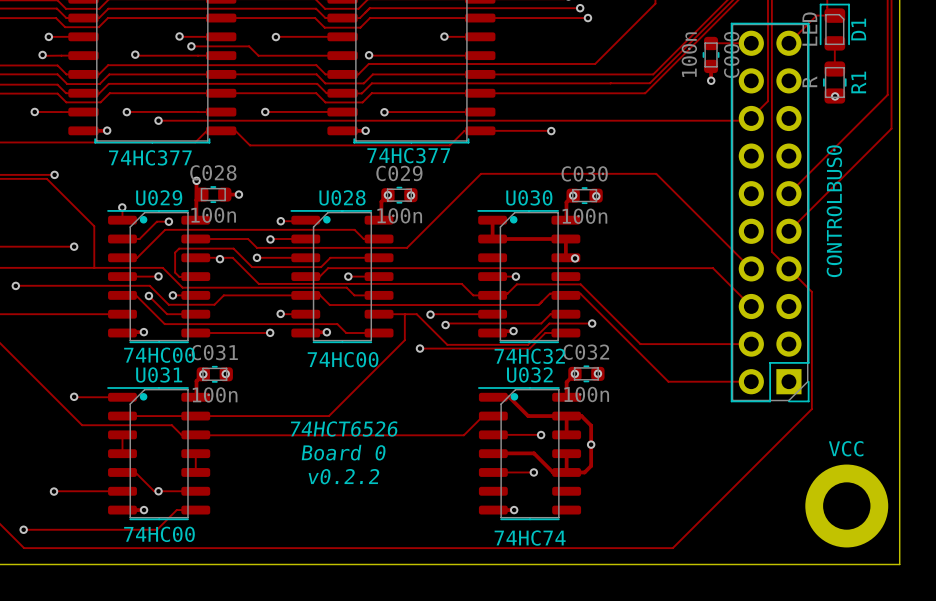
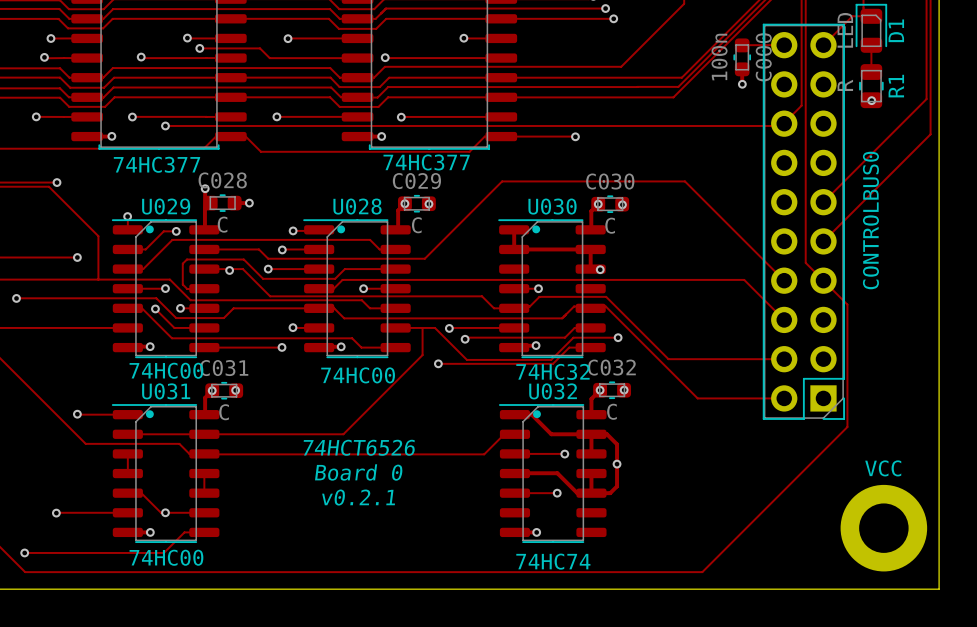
C028 value: 100n (213, 215) -> C (222, 224)
C029 value: 100n (399, 215) -> C (416, 225)
C030 value: 100n (584, 216) -> C (610, 225)
C031 value: 100n (215, 394) -> C (224, 412)
C032 value: 100n (586, 394) -> C (611, 411)
text: v0.2.2 (344, 476) -> v0.2.1 (358, 497)

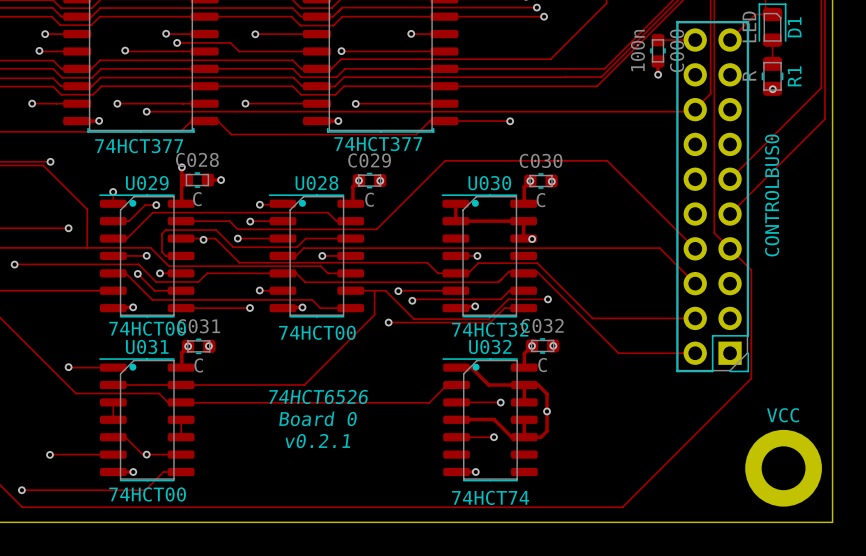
part value: 74HC377 (426, 162) -> 74HCT377 (378, 144)
part value: 74HC377 (156, 164) -> 74HCT377 (139, 146)
U029 value: 74HC00 (166, 370) -> 74HCT00 (147, 328)
U030 value: 74HC32 (552, 371) -> 74HCT32 (490, 329)
U028 value: 74HC00 (358, 375) -> 74HCT00 (317, 332)
U031 value: 74HC00 (166, 557) -> 74HCT00 (147, 494)
U032 value: 74HC74 (553, 561) -> 74HCT74 (490, 497)

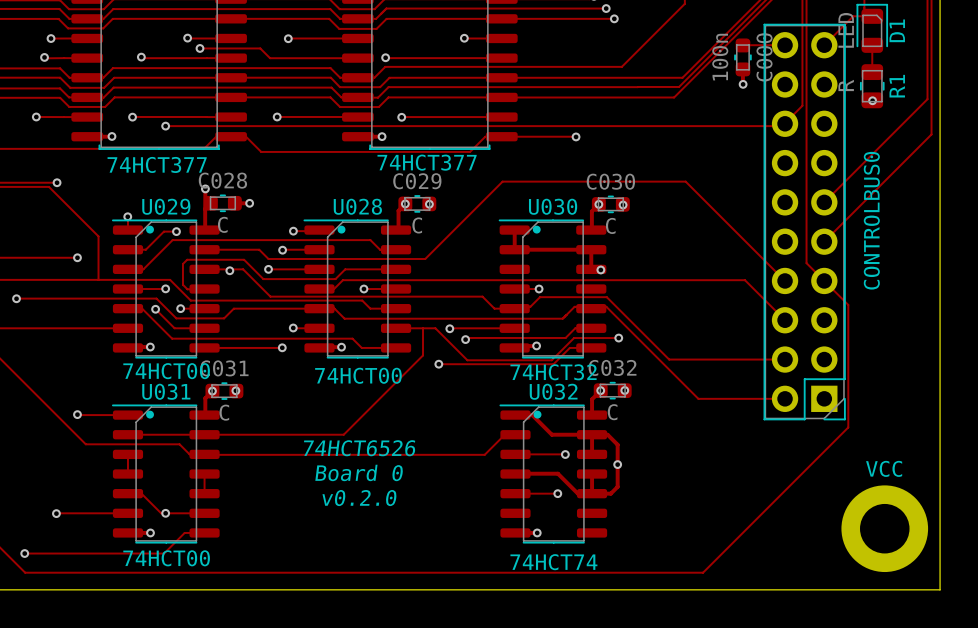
text: v0.2.1 (317, 441) -> v0.2.0 (359, 498)

